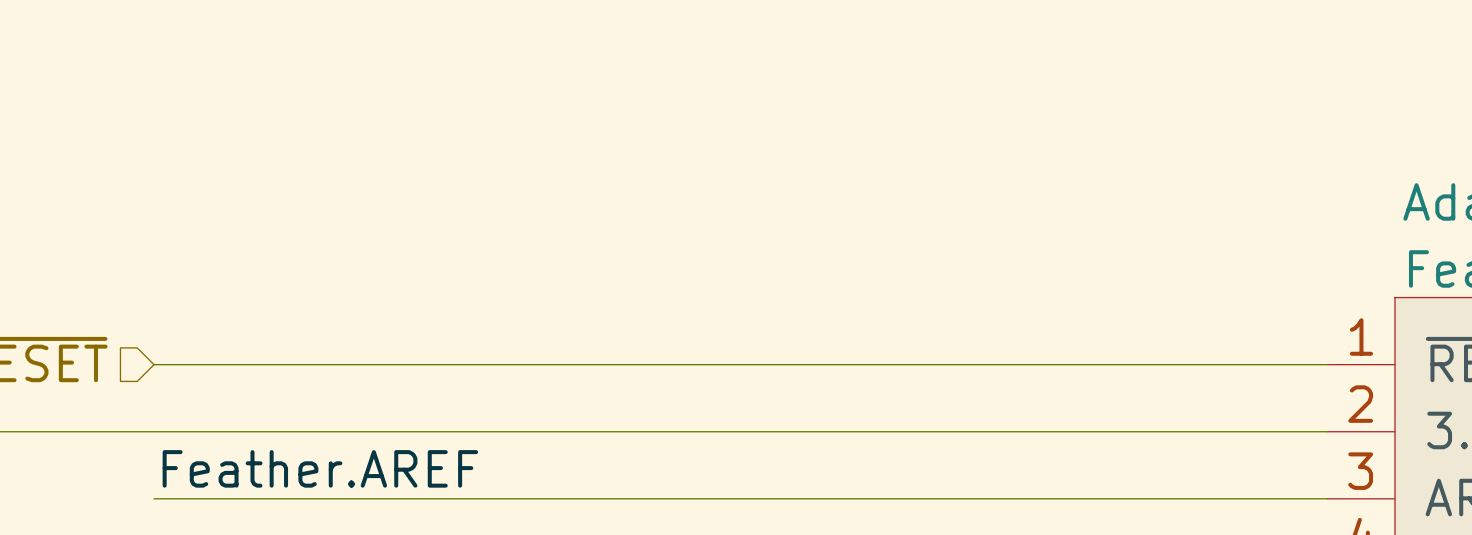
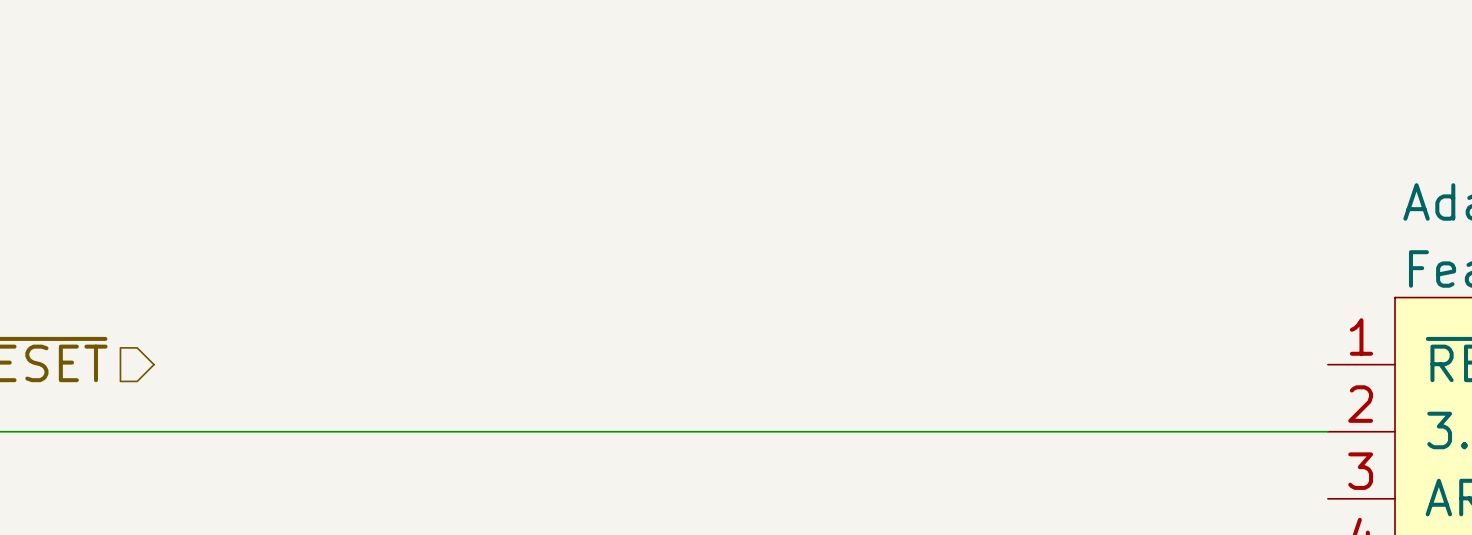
wire: (154, 364) (1327, 364) -> none
label: Feather.AREF (320, 468) -> none
wire: (154, 498) (1327, 498) -> none

